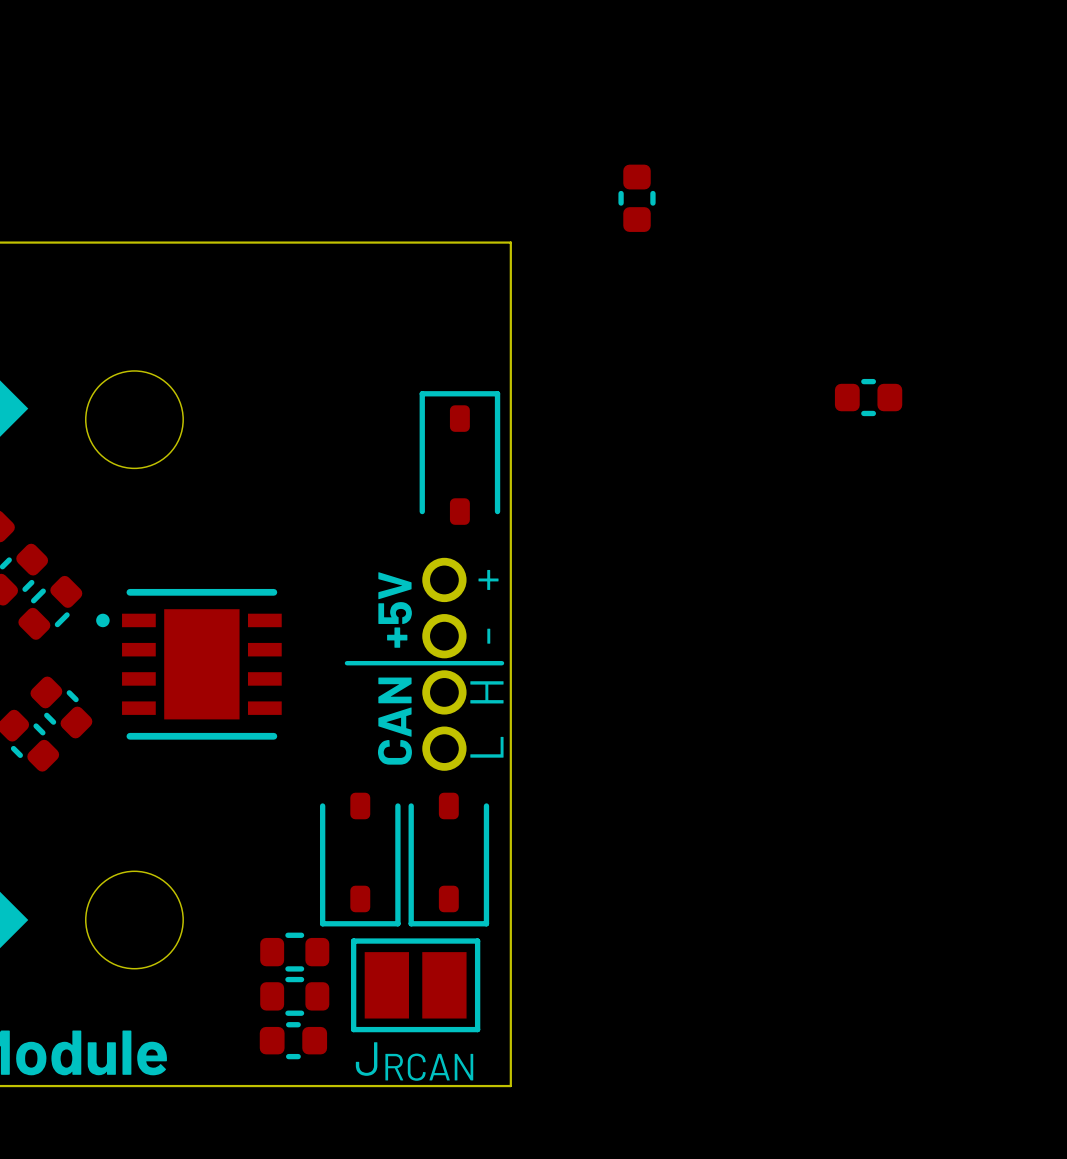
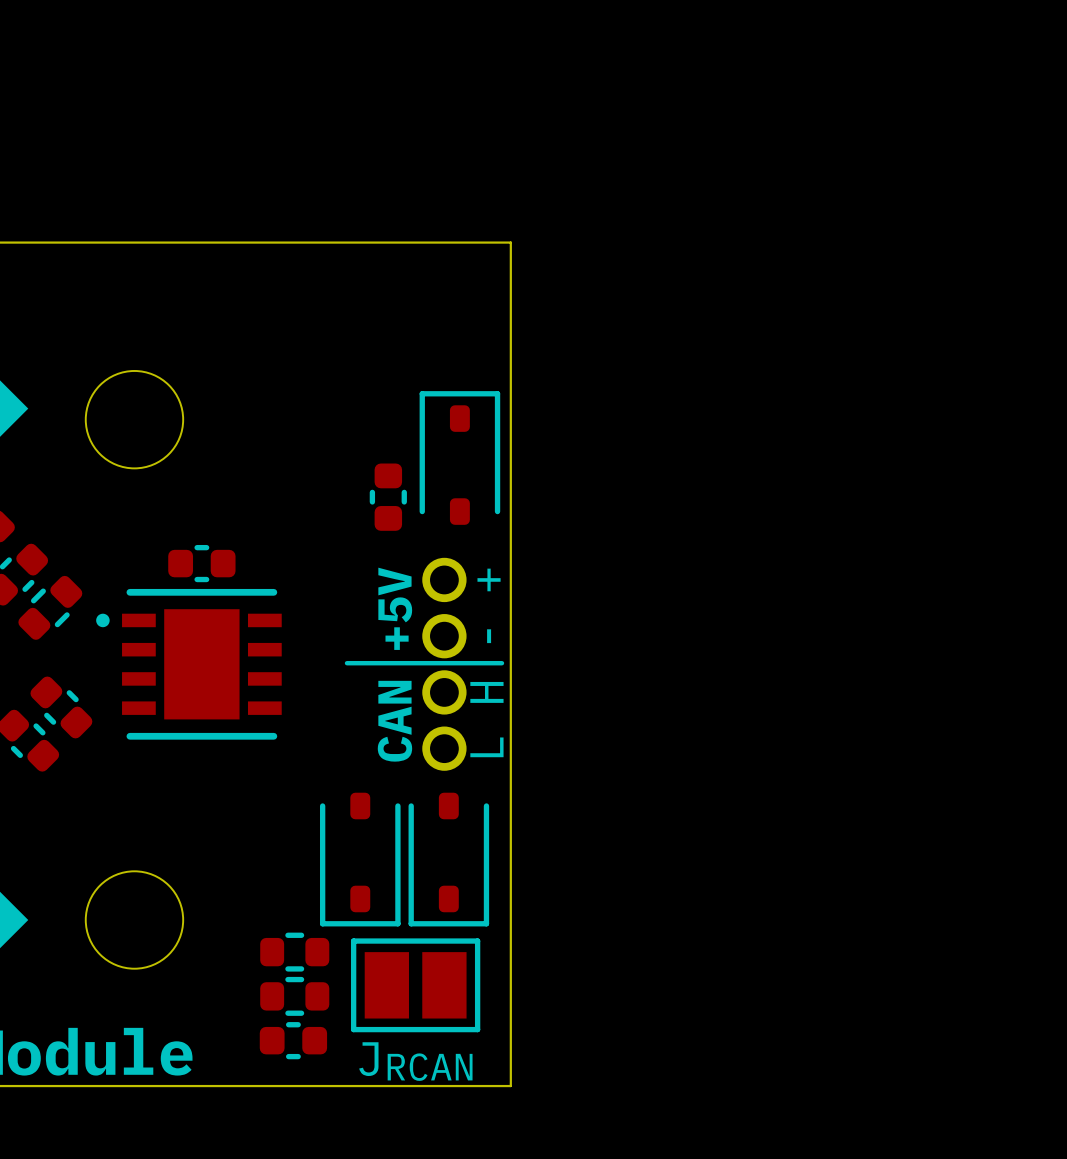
part: (637, 198) -> none
part: (868, 397) -> none
part: none -> (388, 497)
part: none -> (201, 563)

